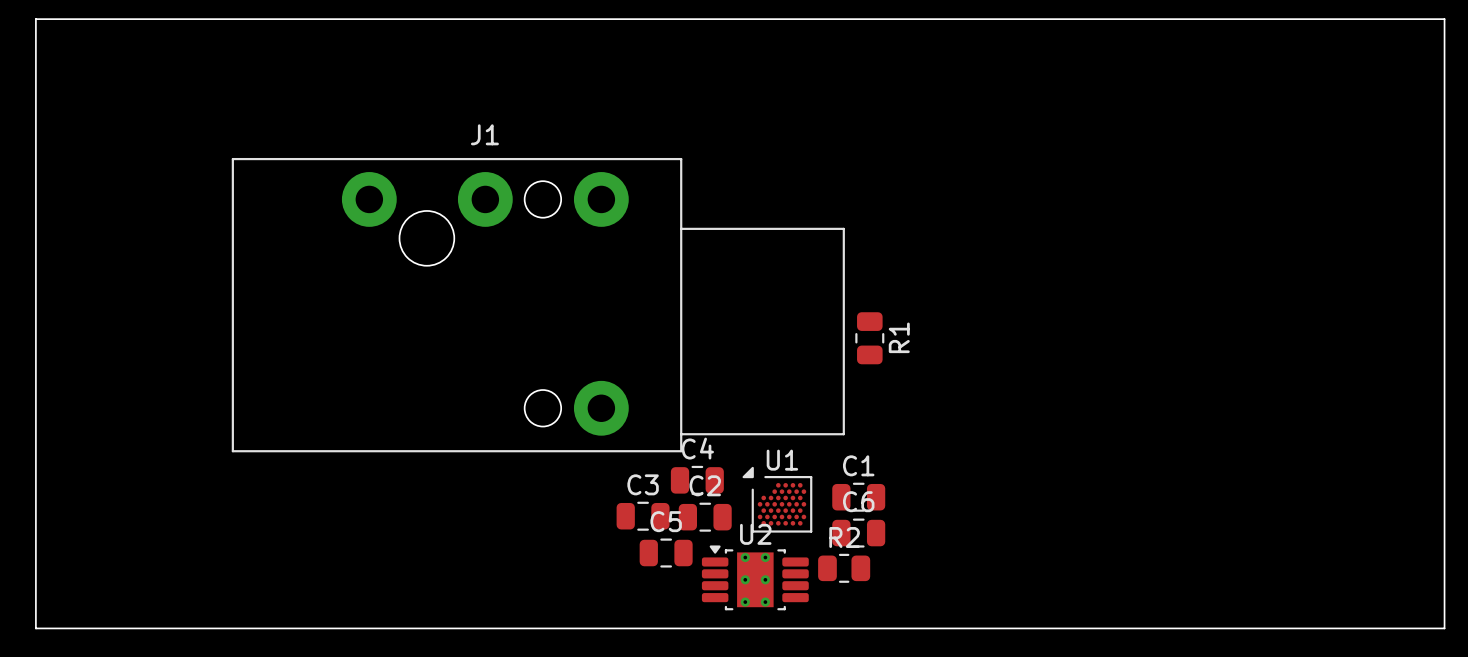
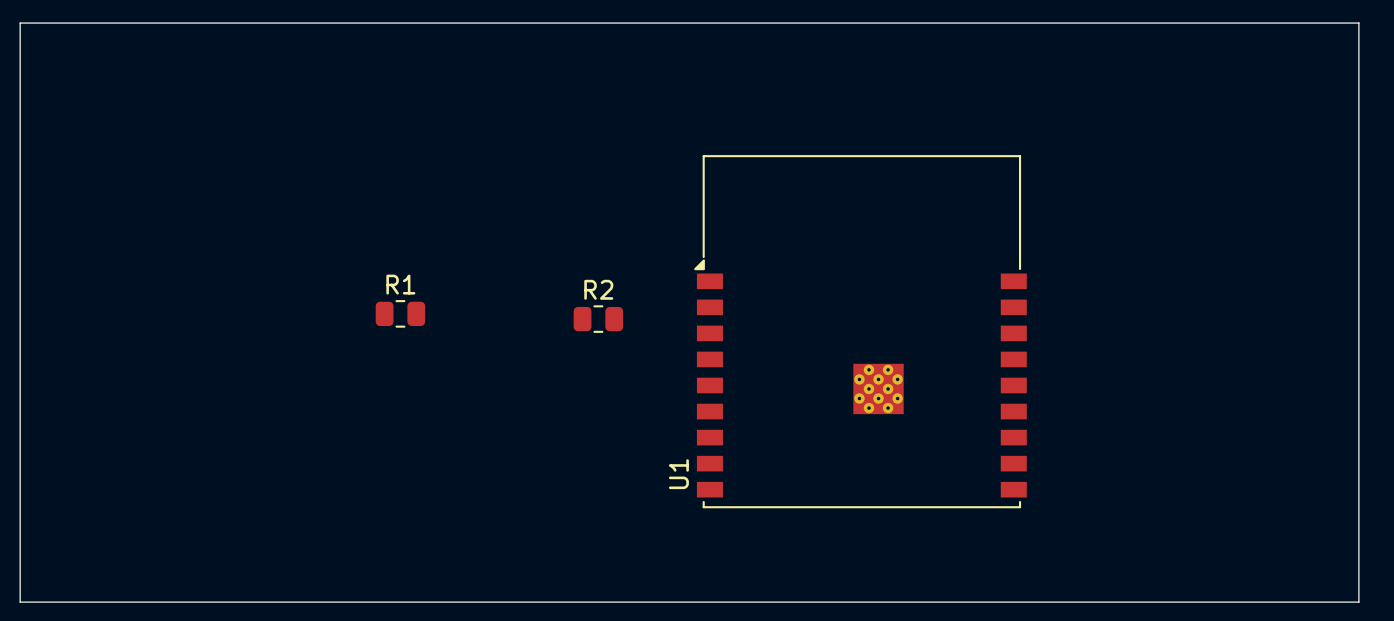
J1: (538, 305) -> none
R1 name position: R1 (899, 337) -> R1 (400, 284)
R1 rotation: 0° (869, 338) -> 90° clockwise (400, 313)
R1 position: (869, 338) -> (400, 313)
U1 name position: U1 (782, 460) -> U1 (678, 474)
U1 footprint: [742, 466, 813, 533] -> [694, 155, 1027, 509]
C4: (697, 480) -> none
C1: (858, 497) -> none
C3: (643, 516) -> none
C2: (705, 517) -> none
C6: (858, 533) -> none
C5: (666, 553) -> none
R2 position: (844, 568) -> (598, 319)
U2: (755, 577) -> none

